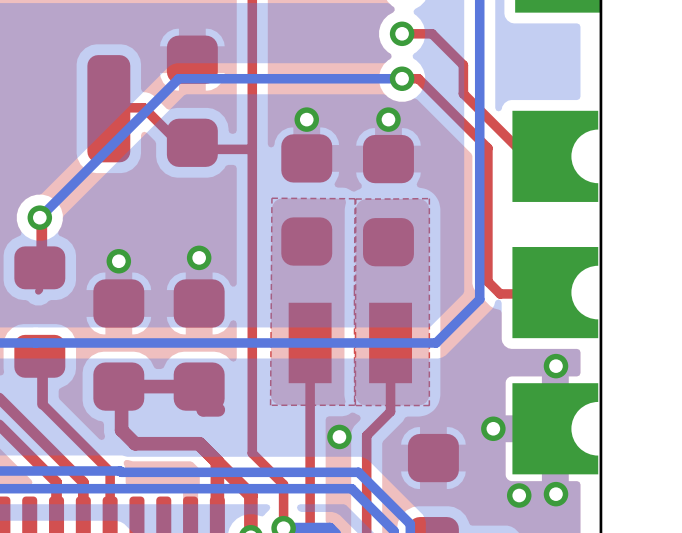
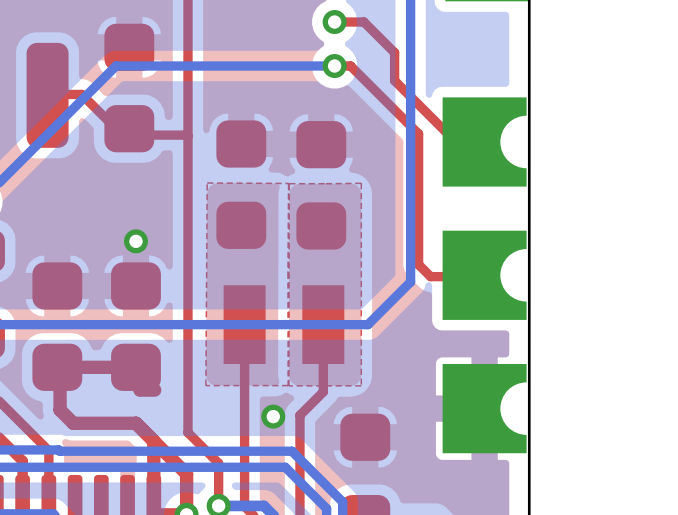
via: (306, 119) -> none
via: (388, 119) -> none
via: (118, 261) -> none
via: (556, 366) -> none
via: (493, 428) -> none
via: (556, 494) -> none
via: (519, 495) -> none

